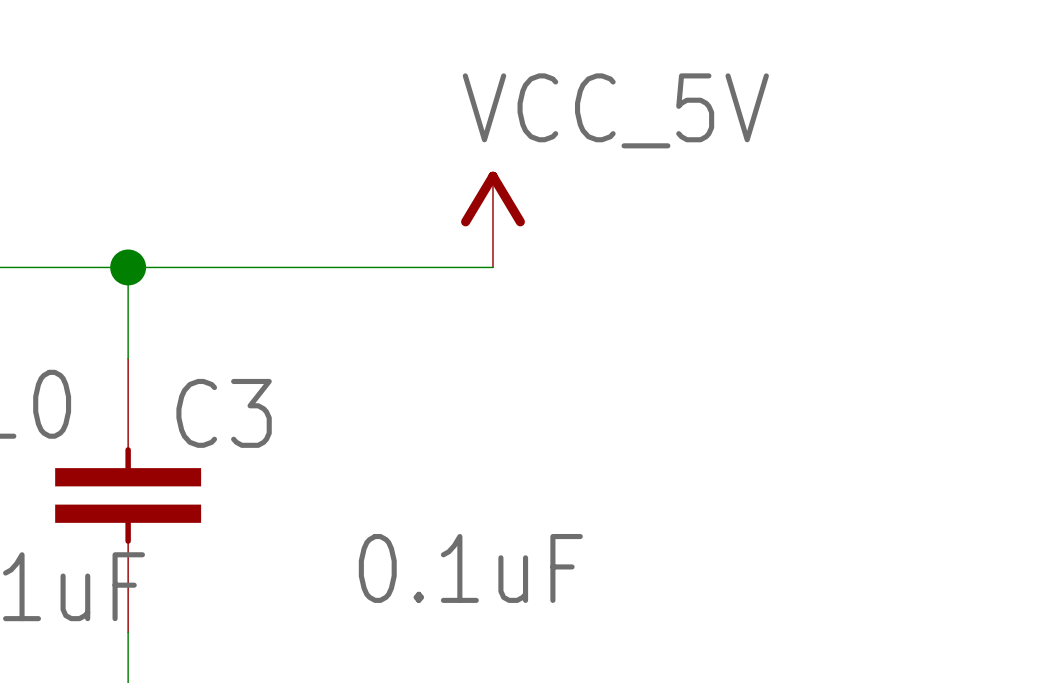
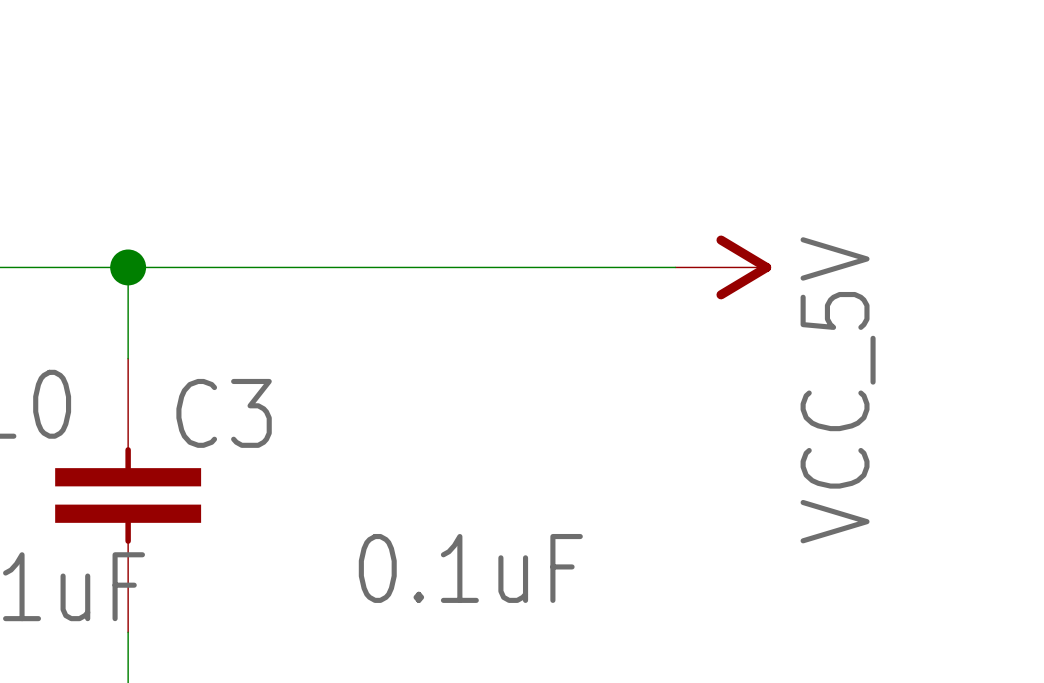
power symbol rotation: 0° (492, 199) -> 90° clockwise (743, 267)
power symbol position: VCC_5V (492, 219) -> VCC_5V (723, 267)
wire: none -> (492, 267) (675, 267)

